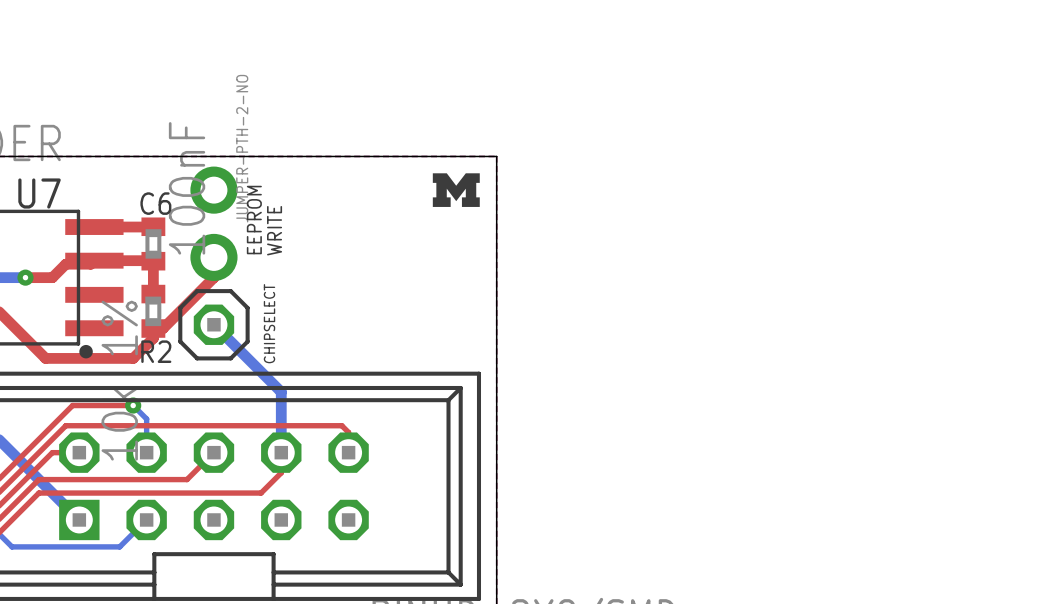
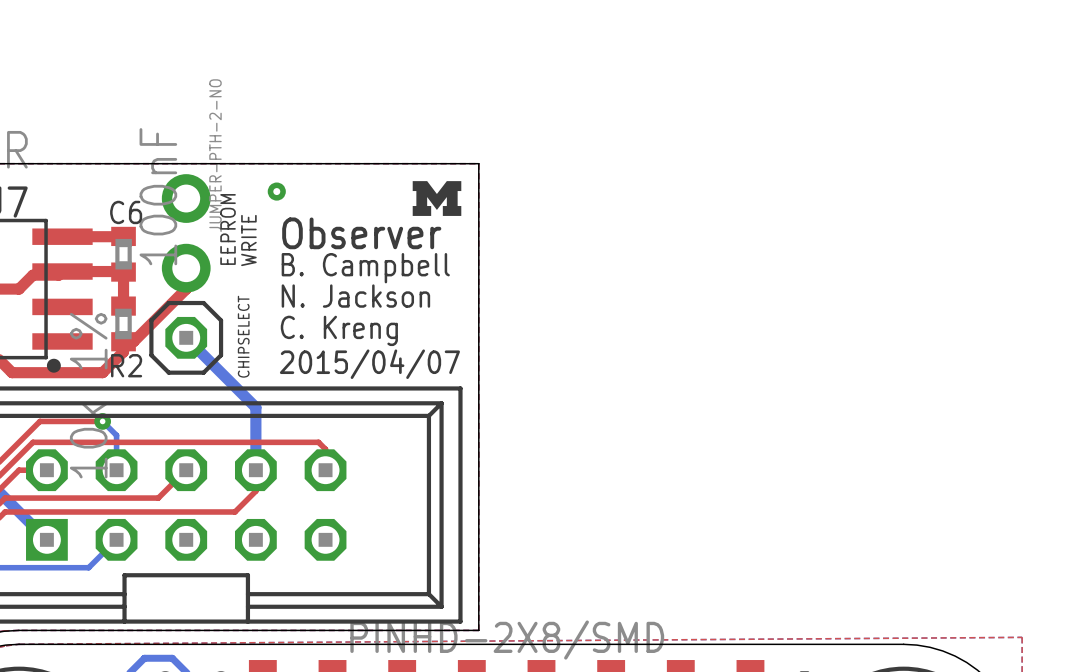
via: none -> (276, 191)
text: none -> Observer (361, 233)
text: none -> B. Campbell (365, 268)
text: none -> N. Jackson (355, 296)
text: none -> C. Kreng (339, 330)
text: none -> 2015/04/07 (369, 364)

